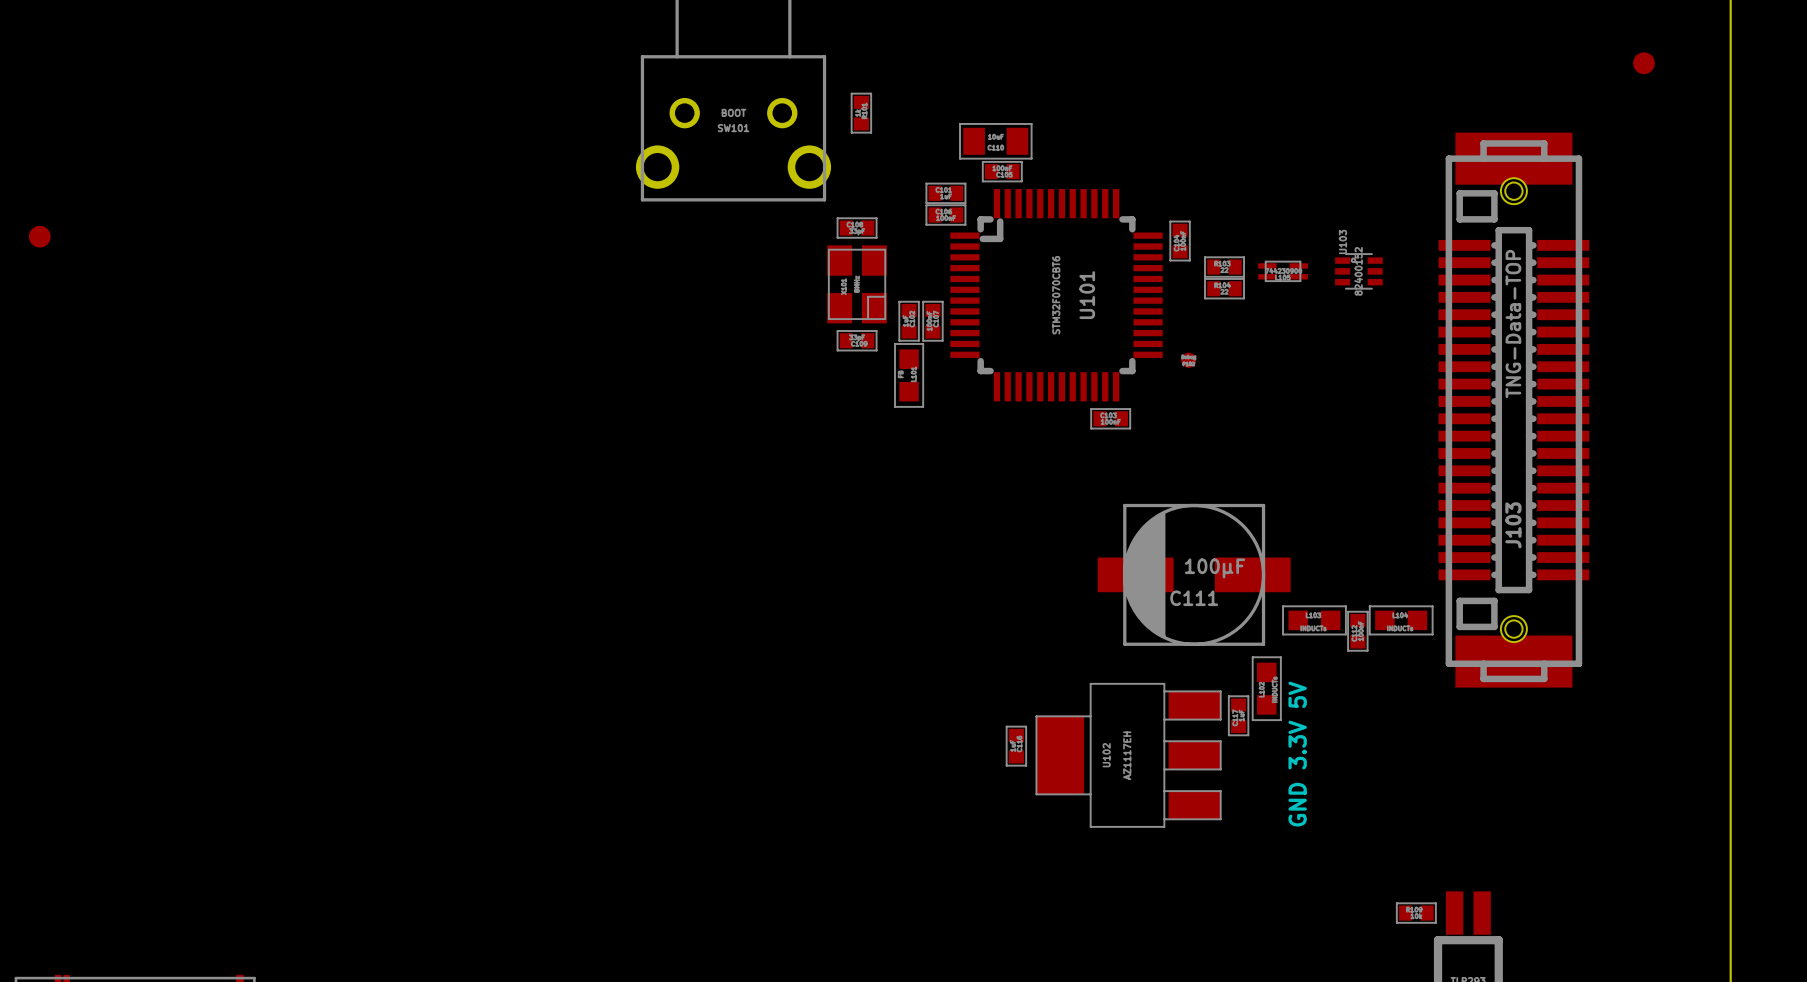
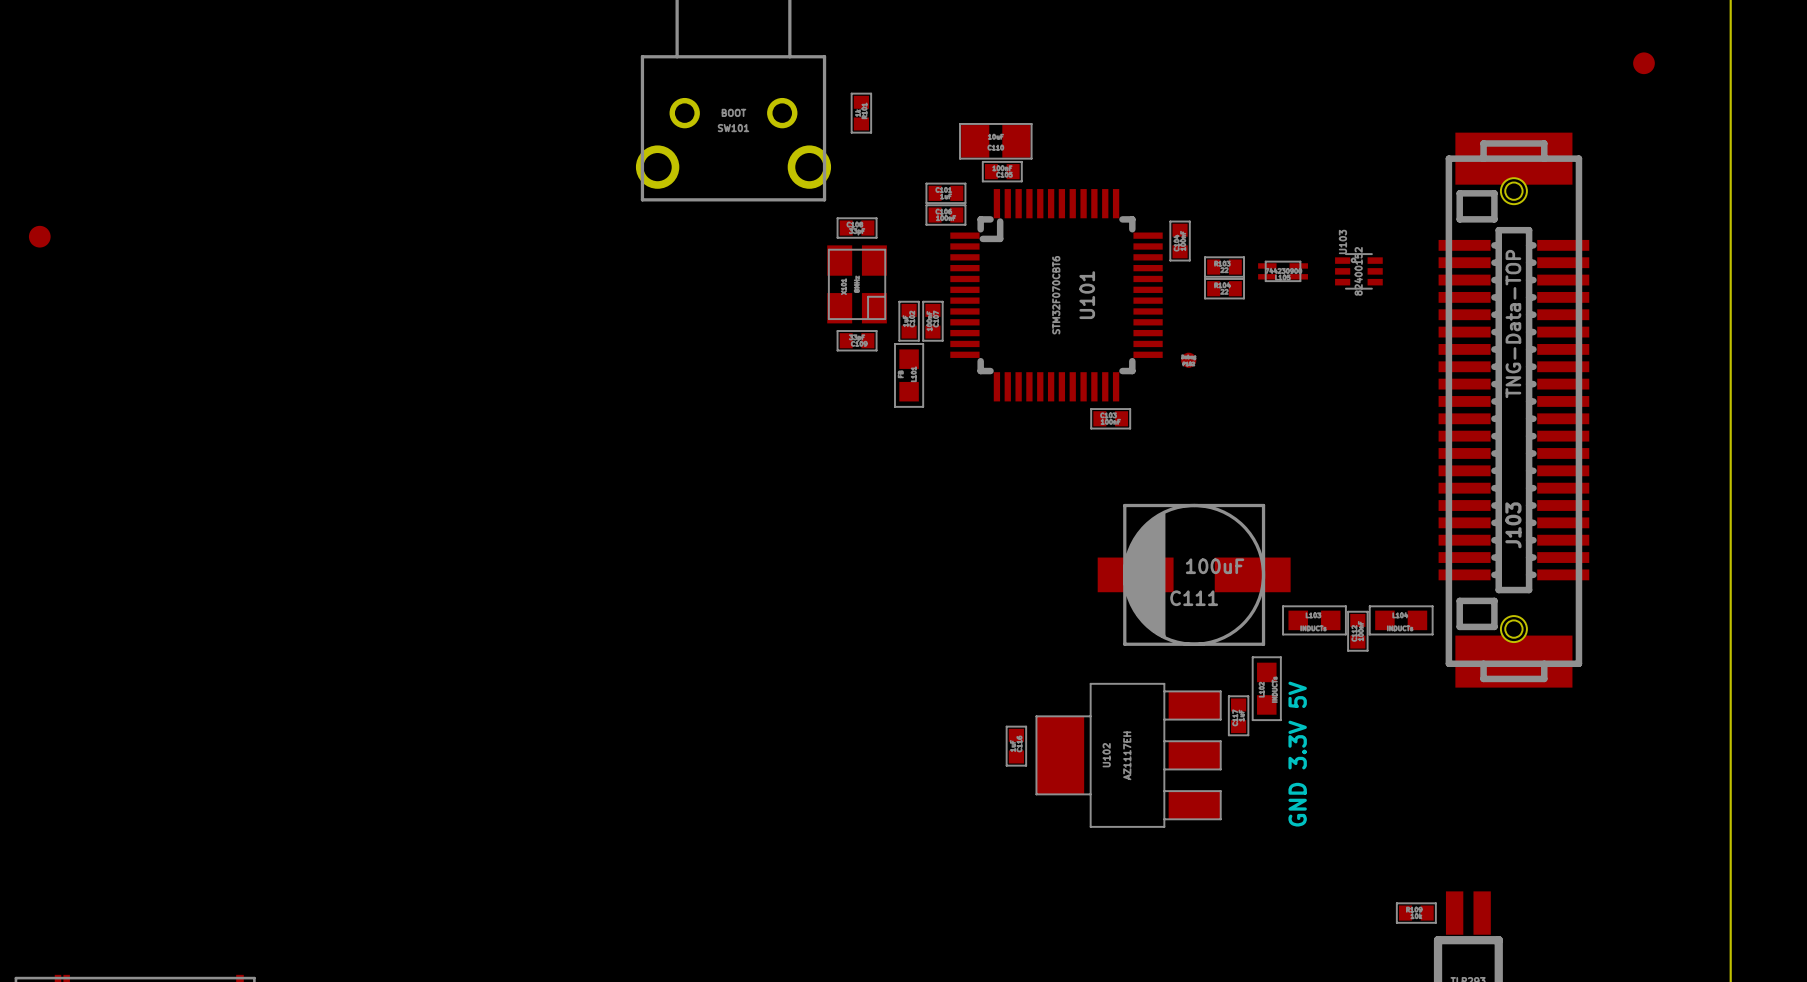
part footprint: [960, 123, 1032, 159] -> [960, 123, 1032, 159]
C111 value: 100µF (1215, 568) -> 100uF (1215, 566)

